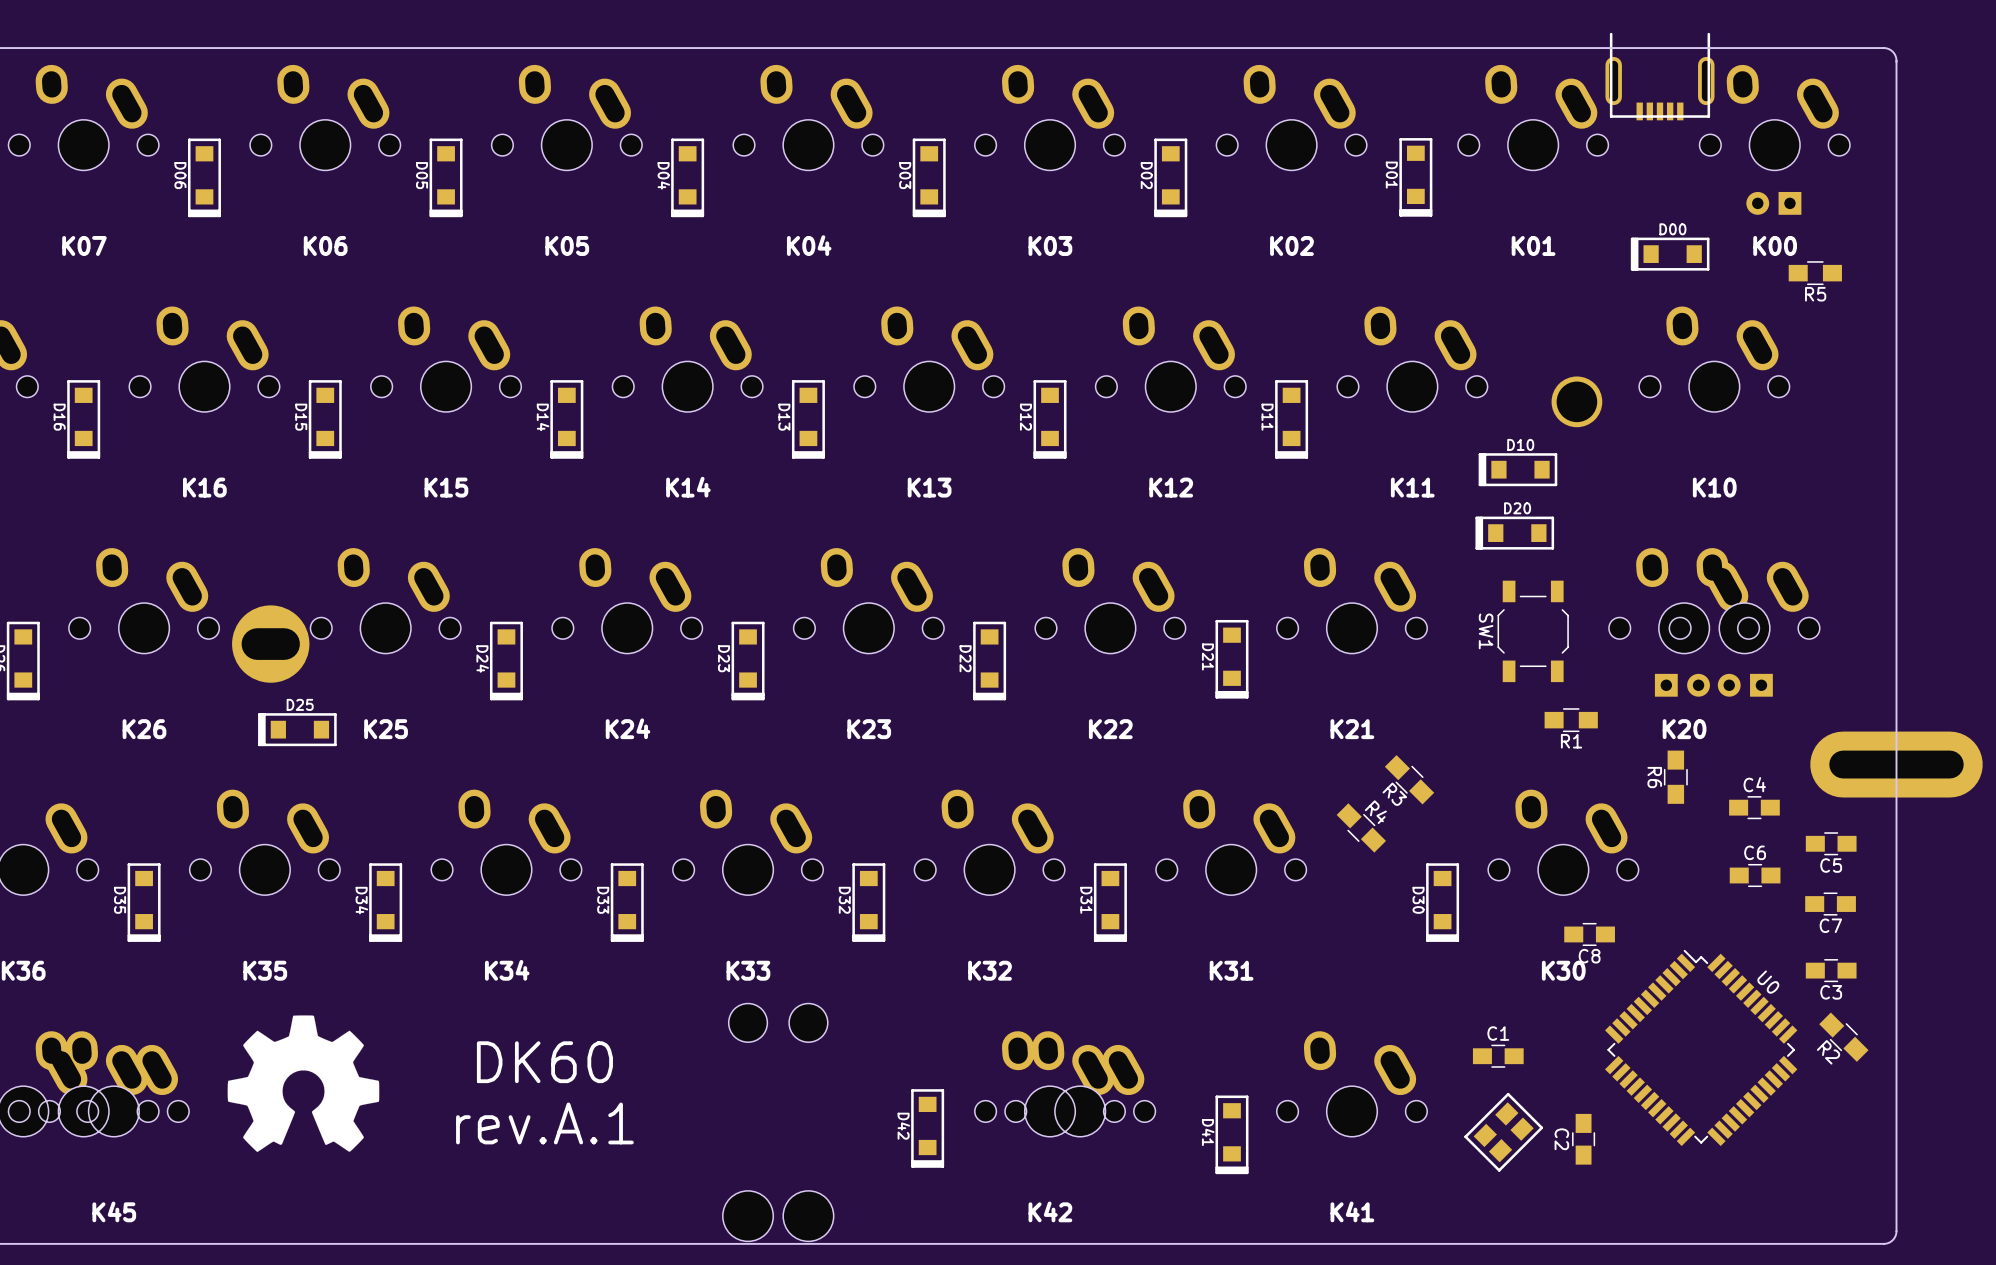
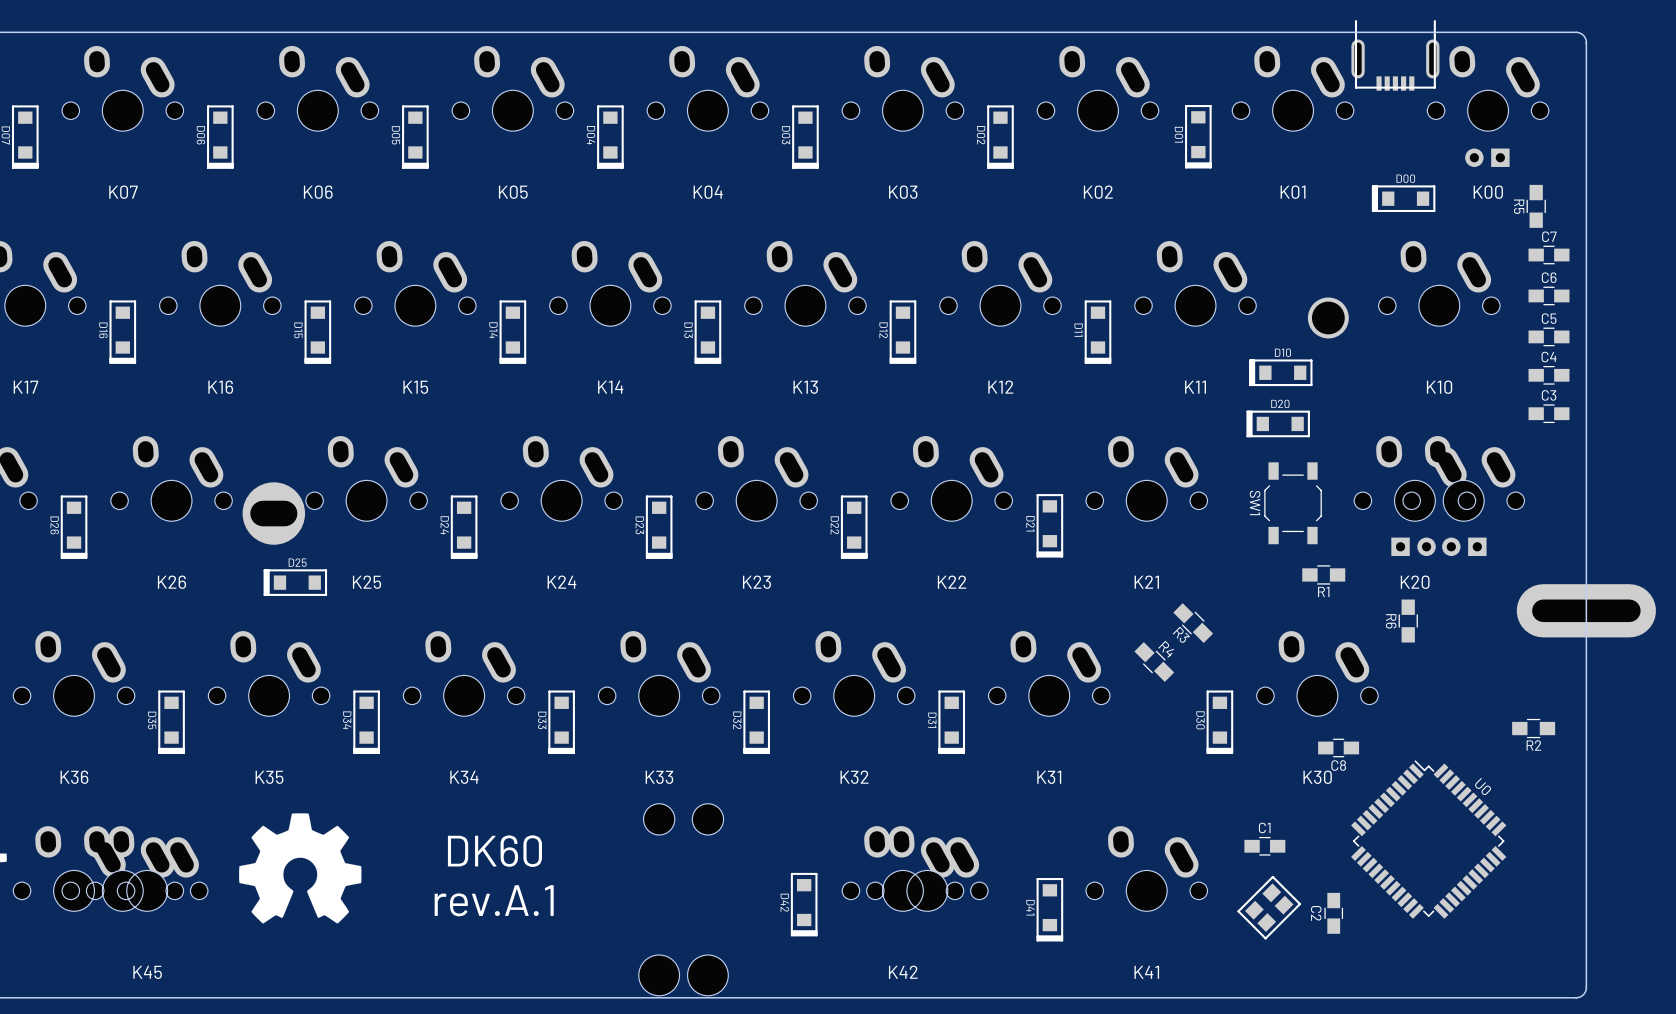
R5 rotation: 0° (1815, 273) -> 90° clockwise (1536, 206)
C4 position: (1754, 807) -> (1548, 375)
C5 position: (1831, 843) -> (1548, 336)
C5 name position: C5 (1831, 865) -> C5 (1549, 318)
C6 position: (1755, 875) -> (1548, 295)
C7 position: (1830, 904) -> (1548, 255)
C7 name position: C7 (1830, 925) -> C7 (1549, 236)
C3 position: (1831, 970) -> (1548, 413)
C3 name position: C3 (1831, 992) -> C3 (1549, 395)
R2 rotation: 0° (1843, 1037) -> 45° counterclockwise (1533, 728)
R2 position: (1843, 1037) -> (1533, 728)

